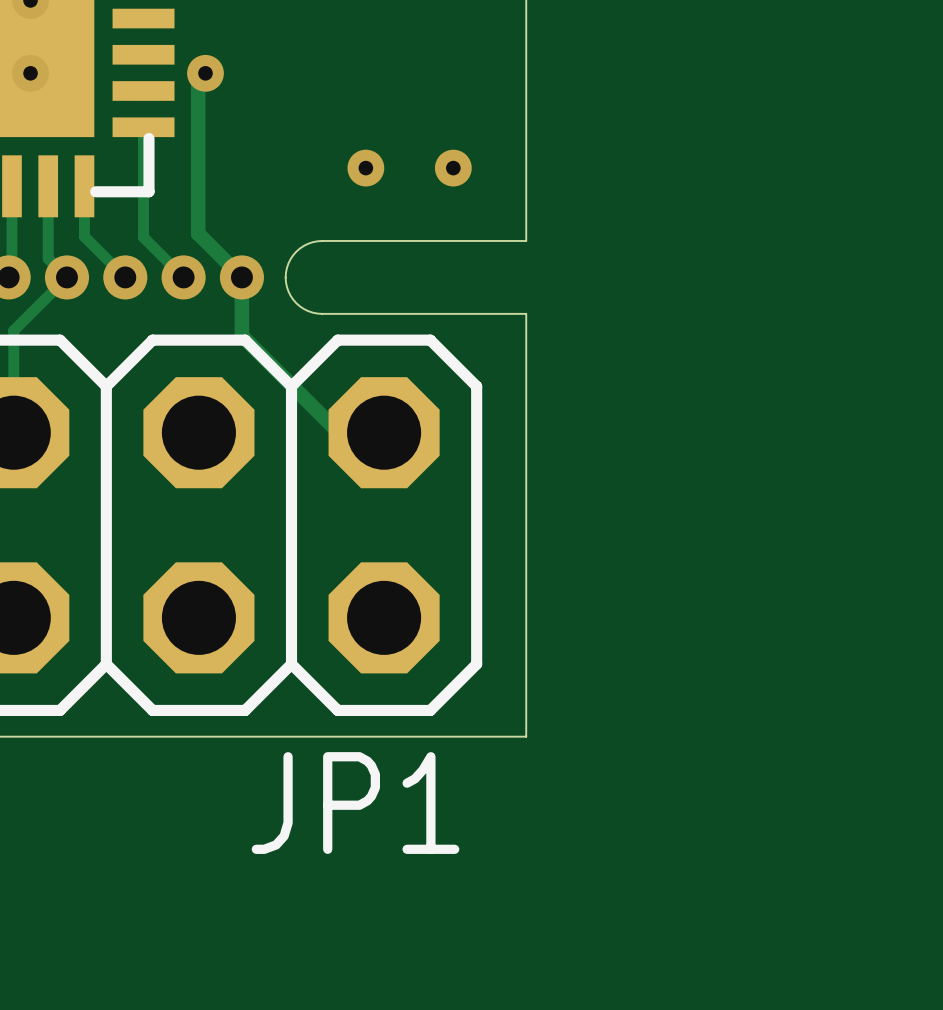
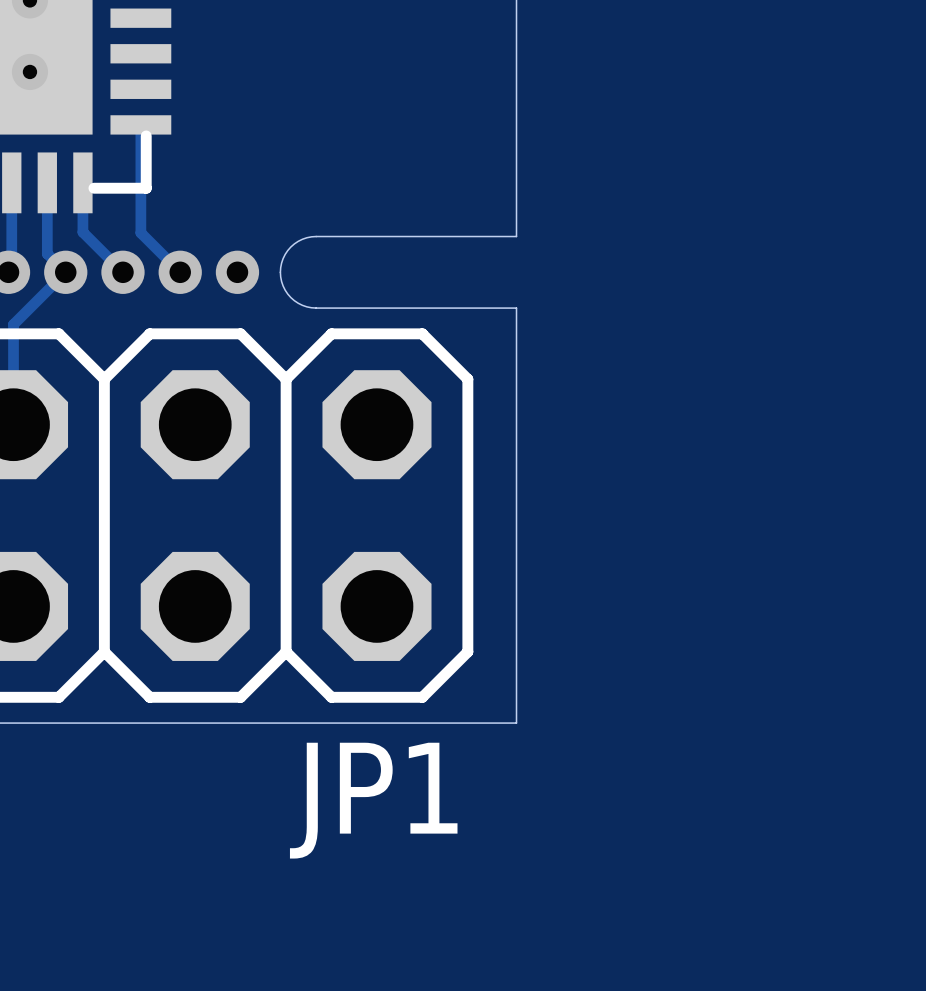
track: (205, 73) (198, 80) (198, 233) (241, 277) (241, 335) (338, 432) (384, 432) -> none
via: (205, 73) -> none
via: (365, 168) -> none
via: (453, 168) -> none

